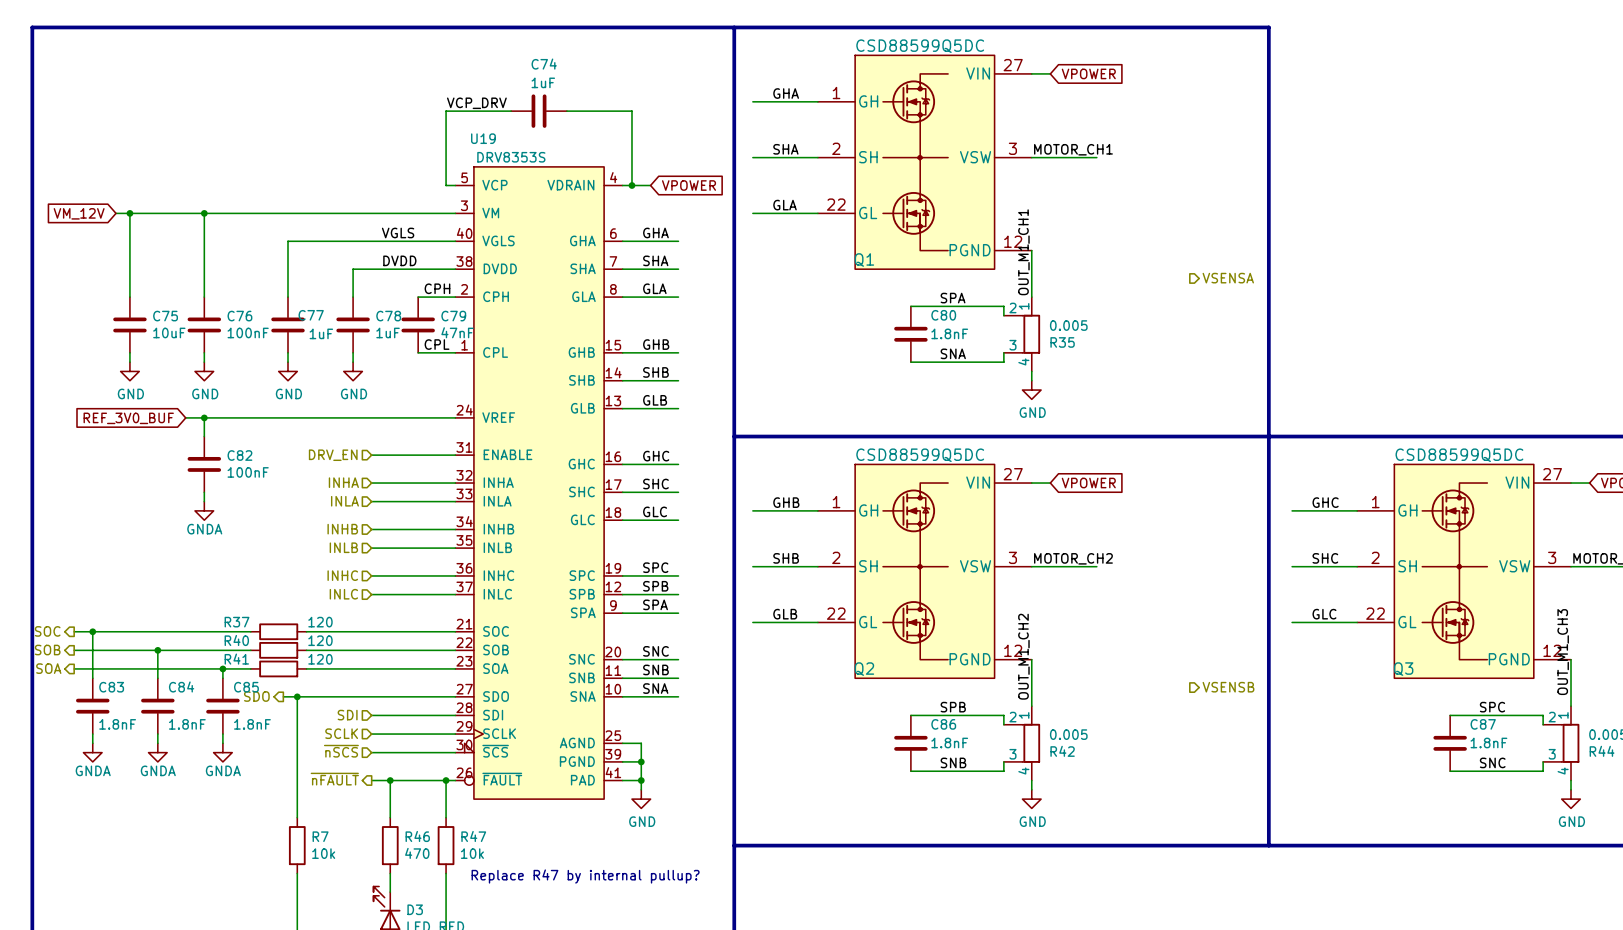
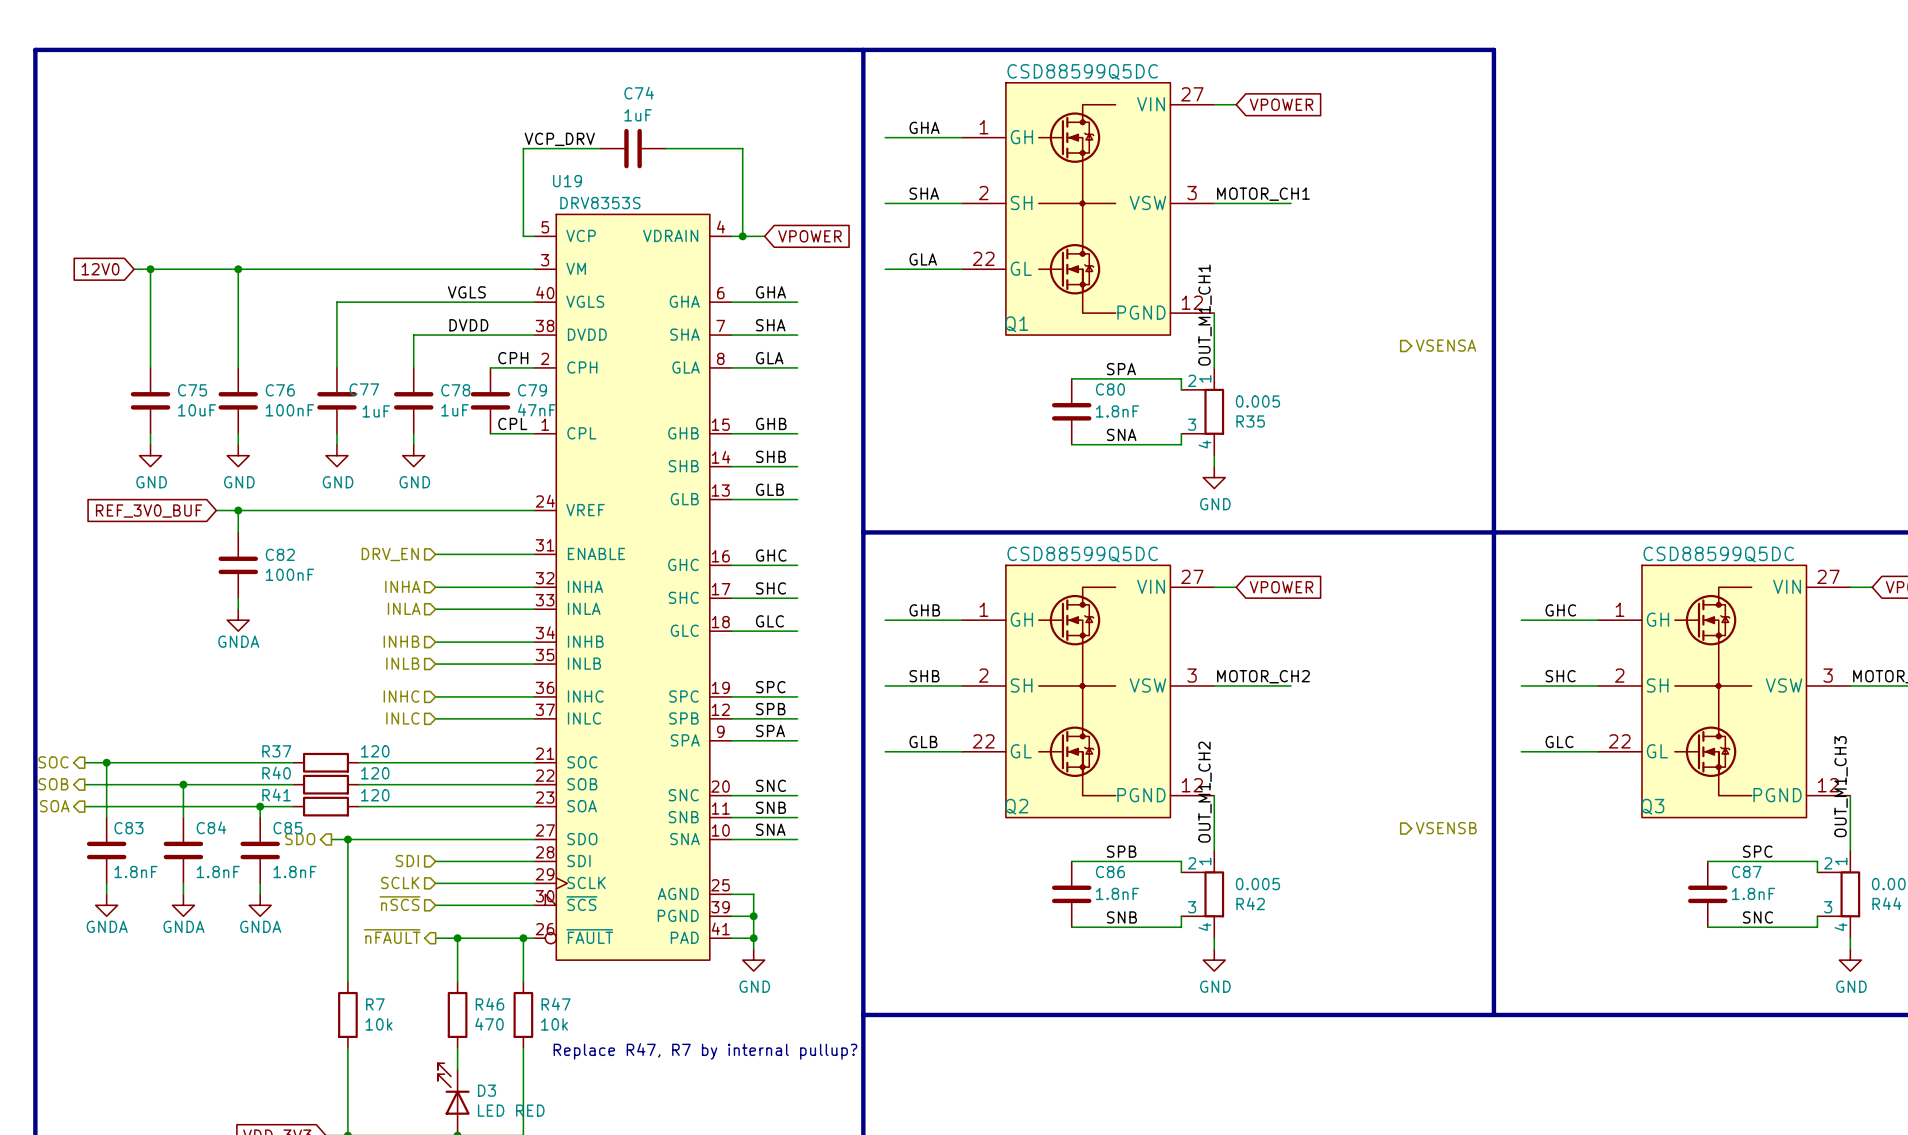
global label: VM_12V (79, 213) -> 12V0 (100, 269)
text: Replace R47 by internal pullup? (585, 876) -> Replace R47, R7 by internal pullup? (705, 1051)

